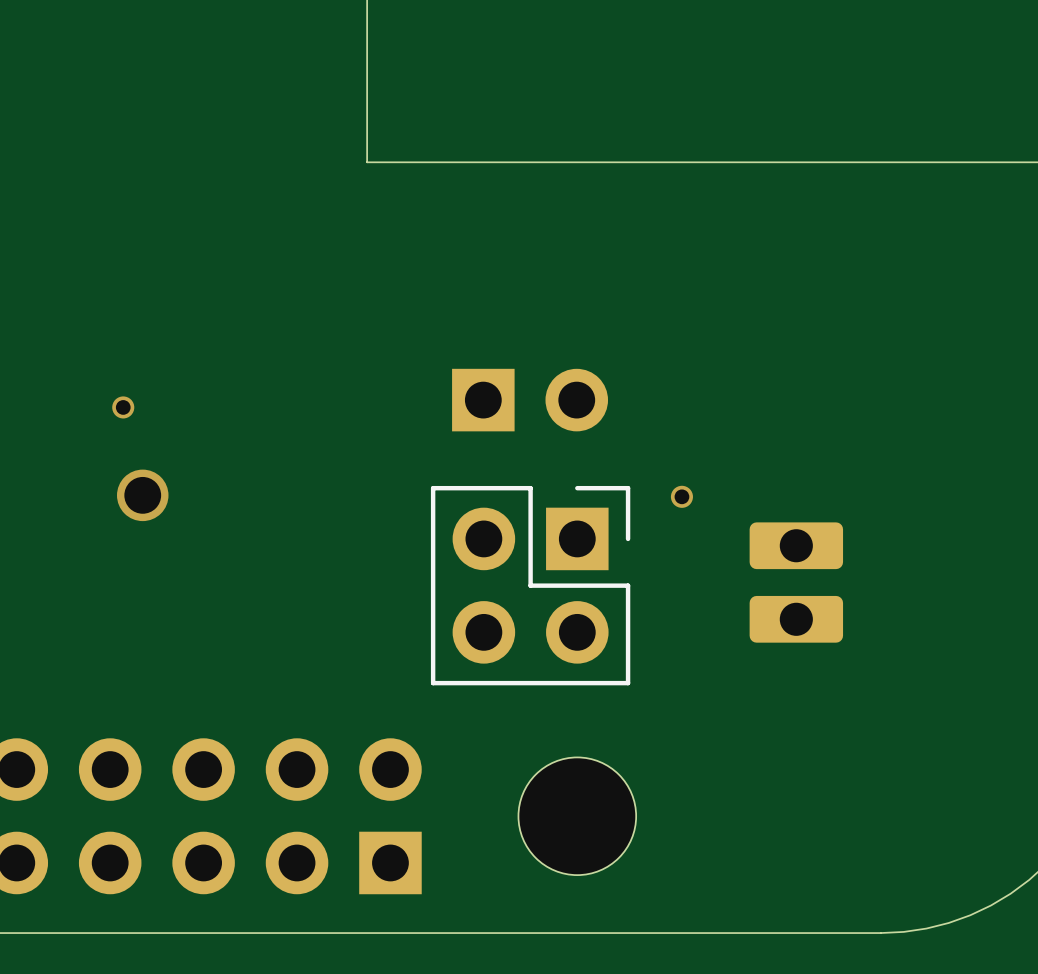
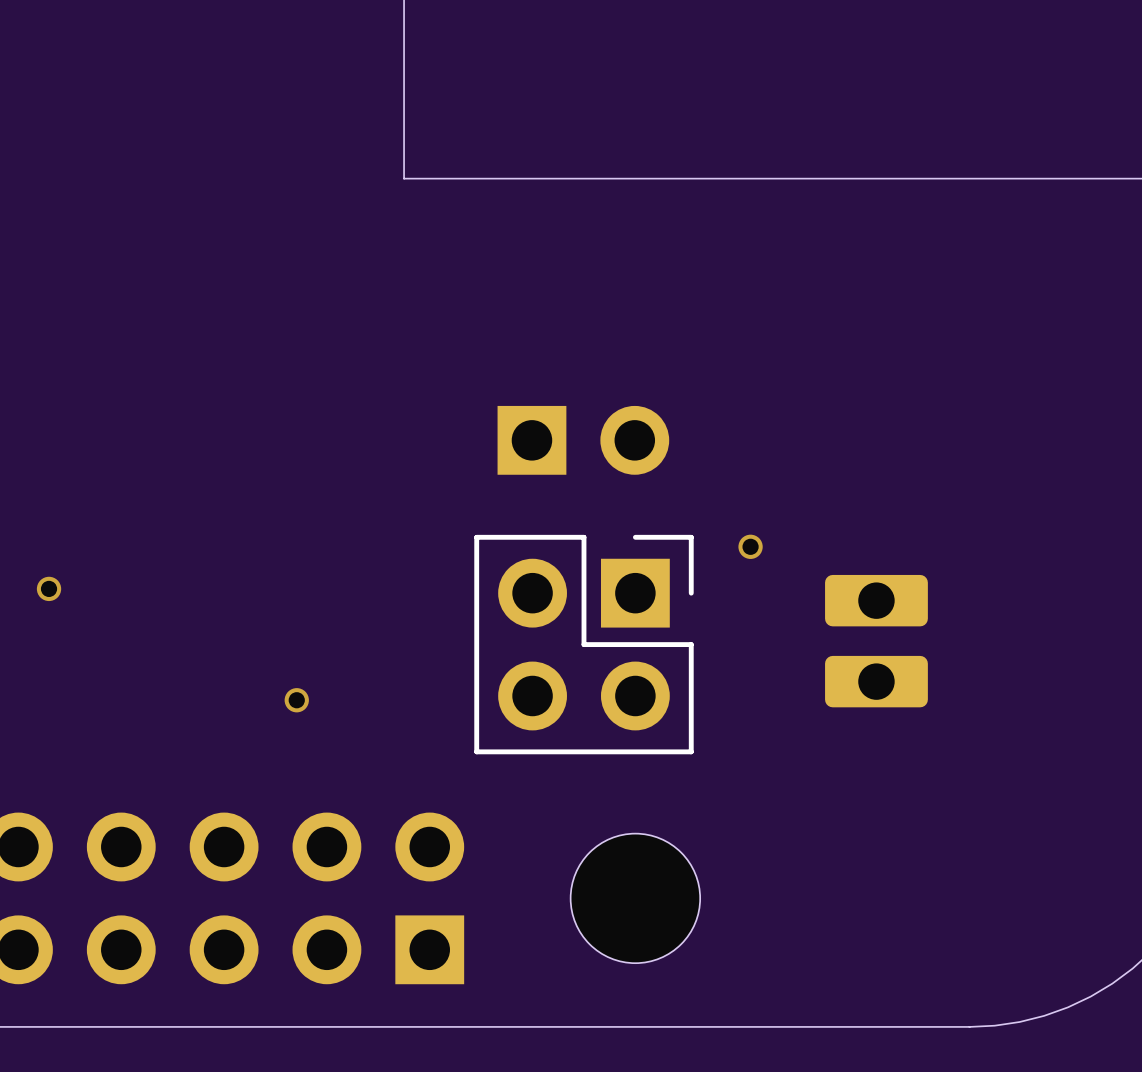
via: (123, 407) -> none
via: (142, 495) -> none
via: none -> (49, 588)
via: none -> (296, 700)

